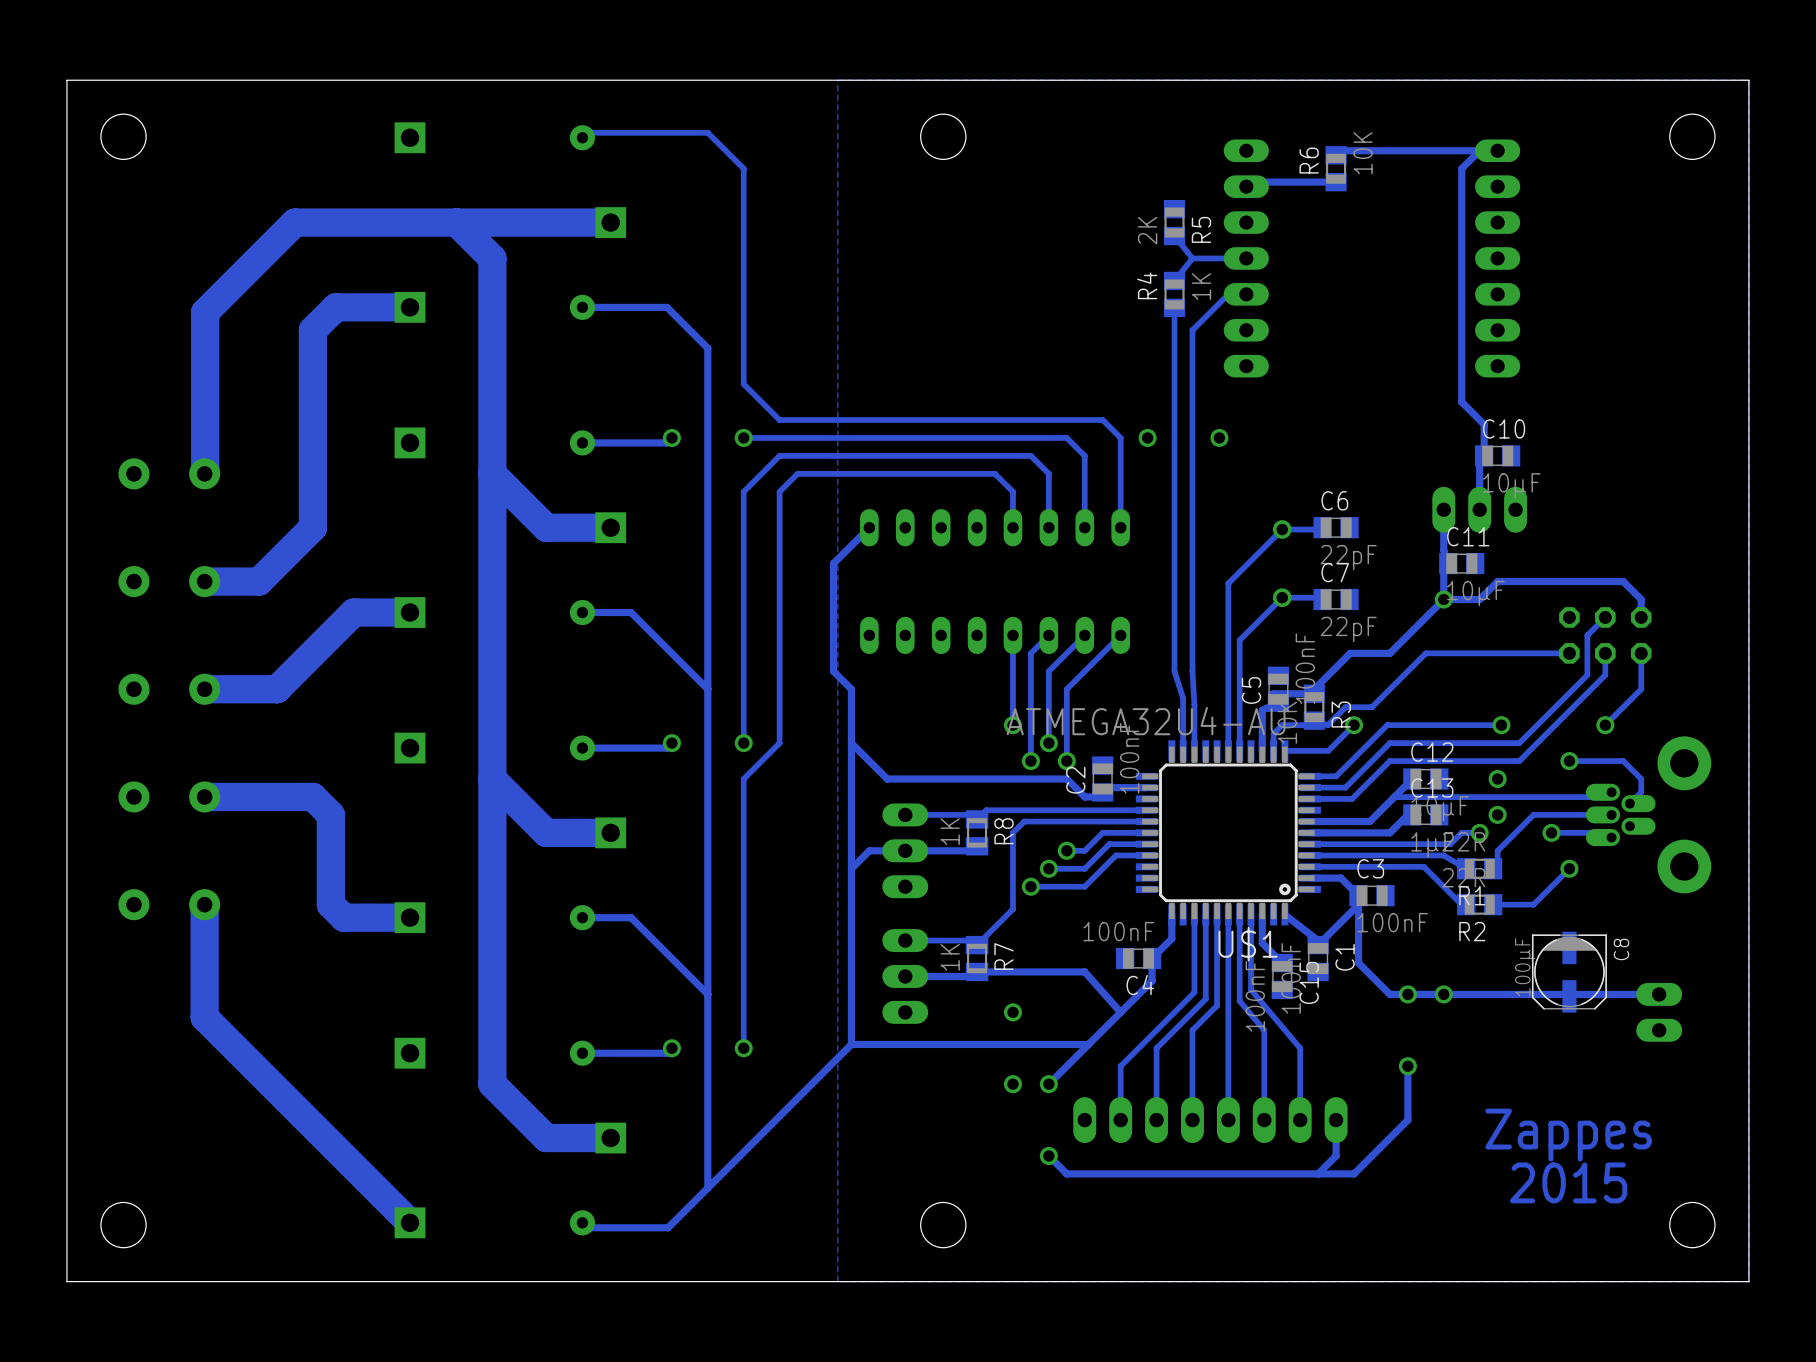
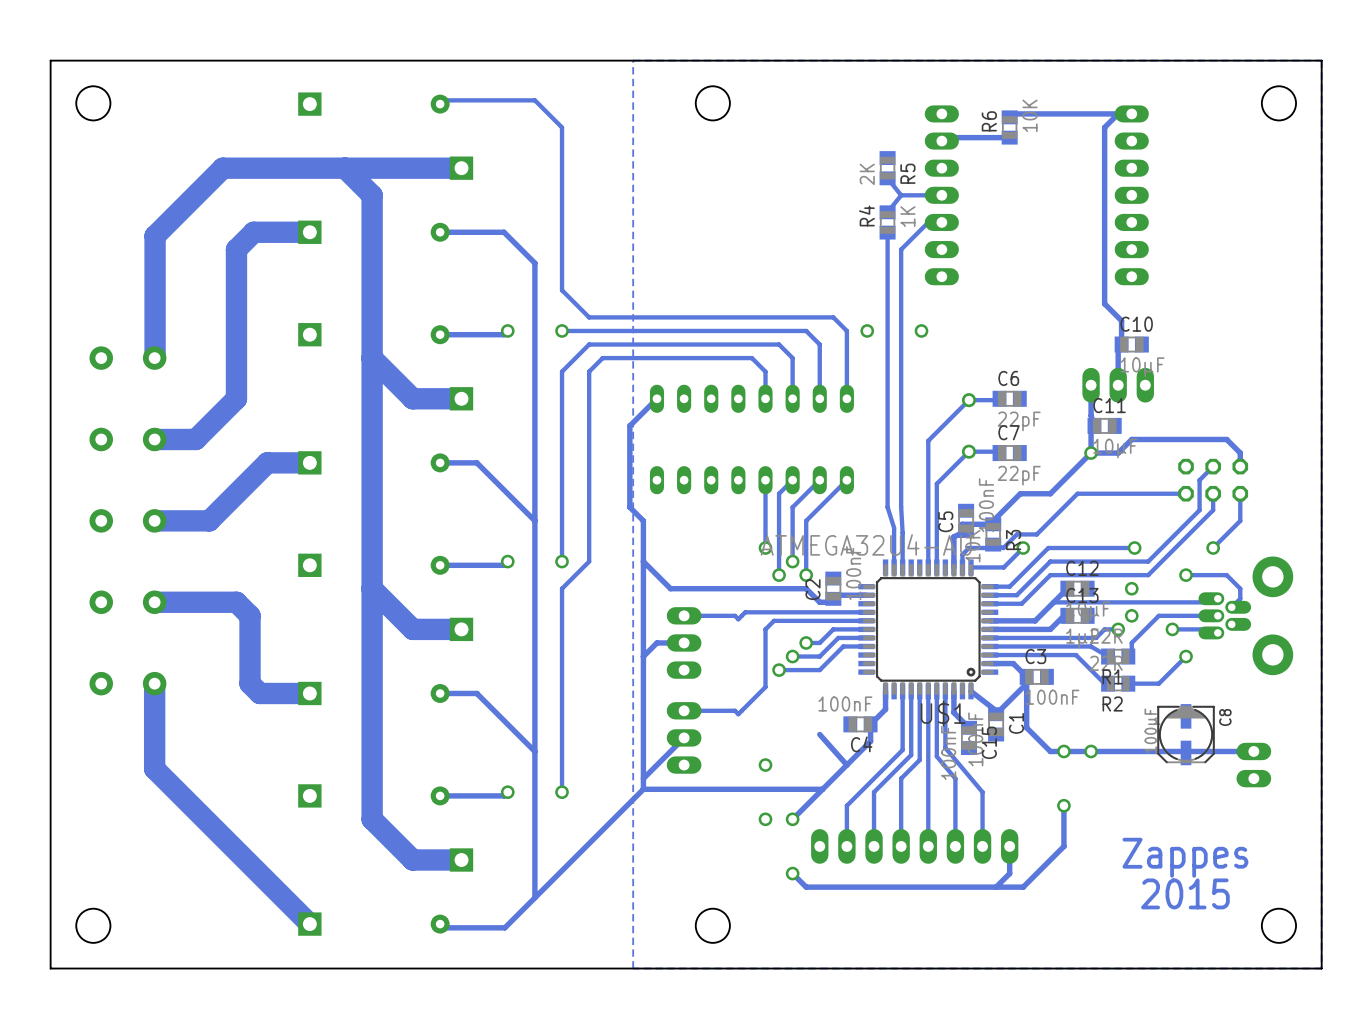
R8: 1K (977, 832) -> none
track: (977, 846) (972, 850) (905, 850) -> none
R7: 1K (977, 958) -> none
track: (1084, 971) (977, 971) (972, 976) (905, 976) -> (643, 789) (643, 778) (684, 737)

